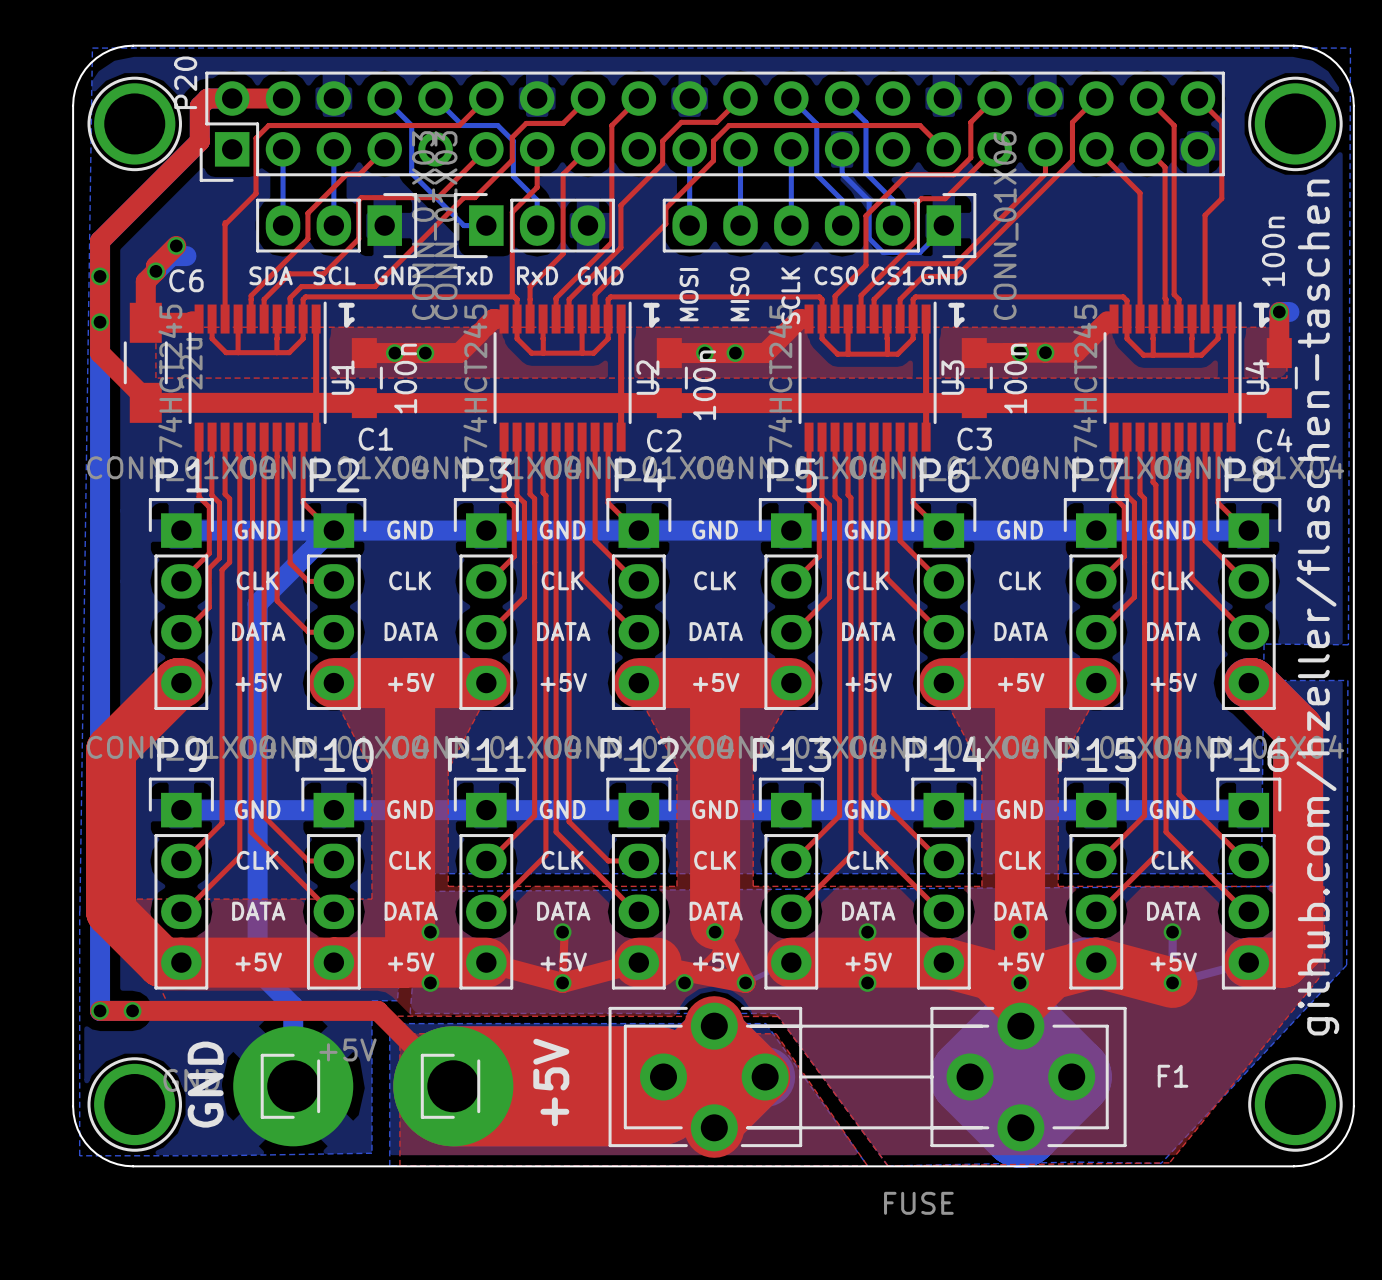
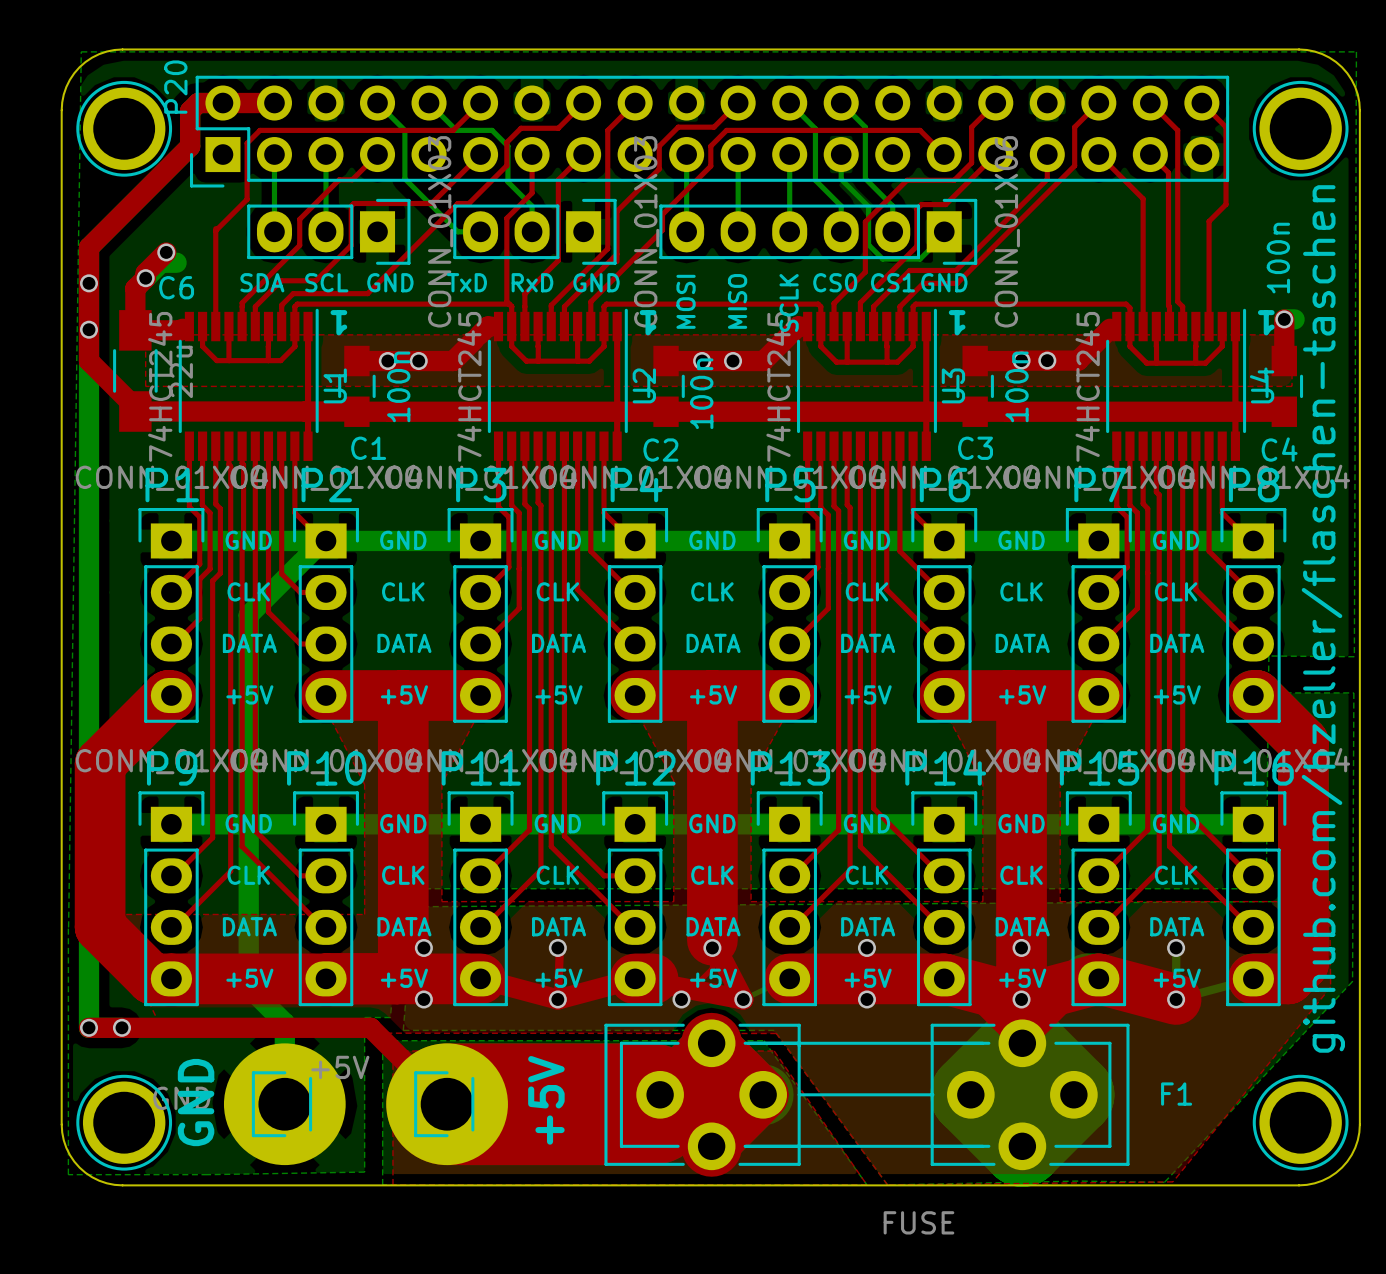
part rotation: 0° (534, 225) -> 180° (534, 231)

